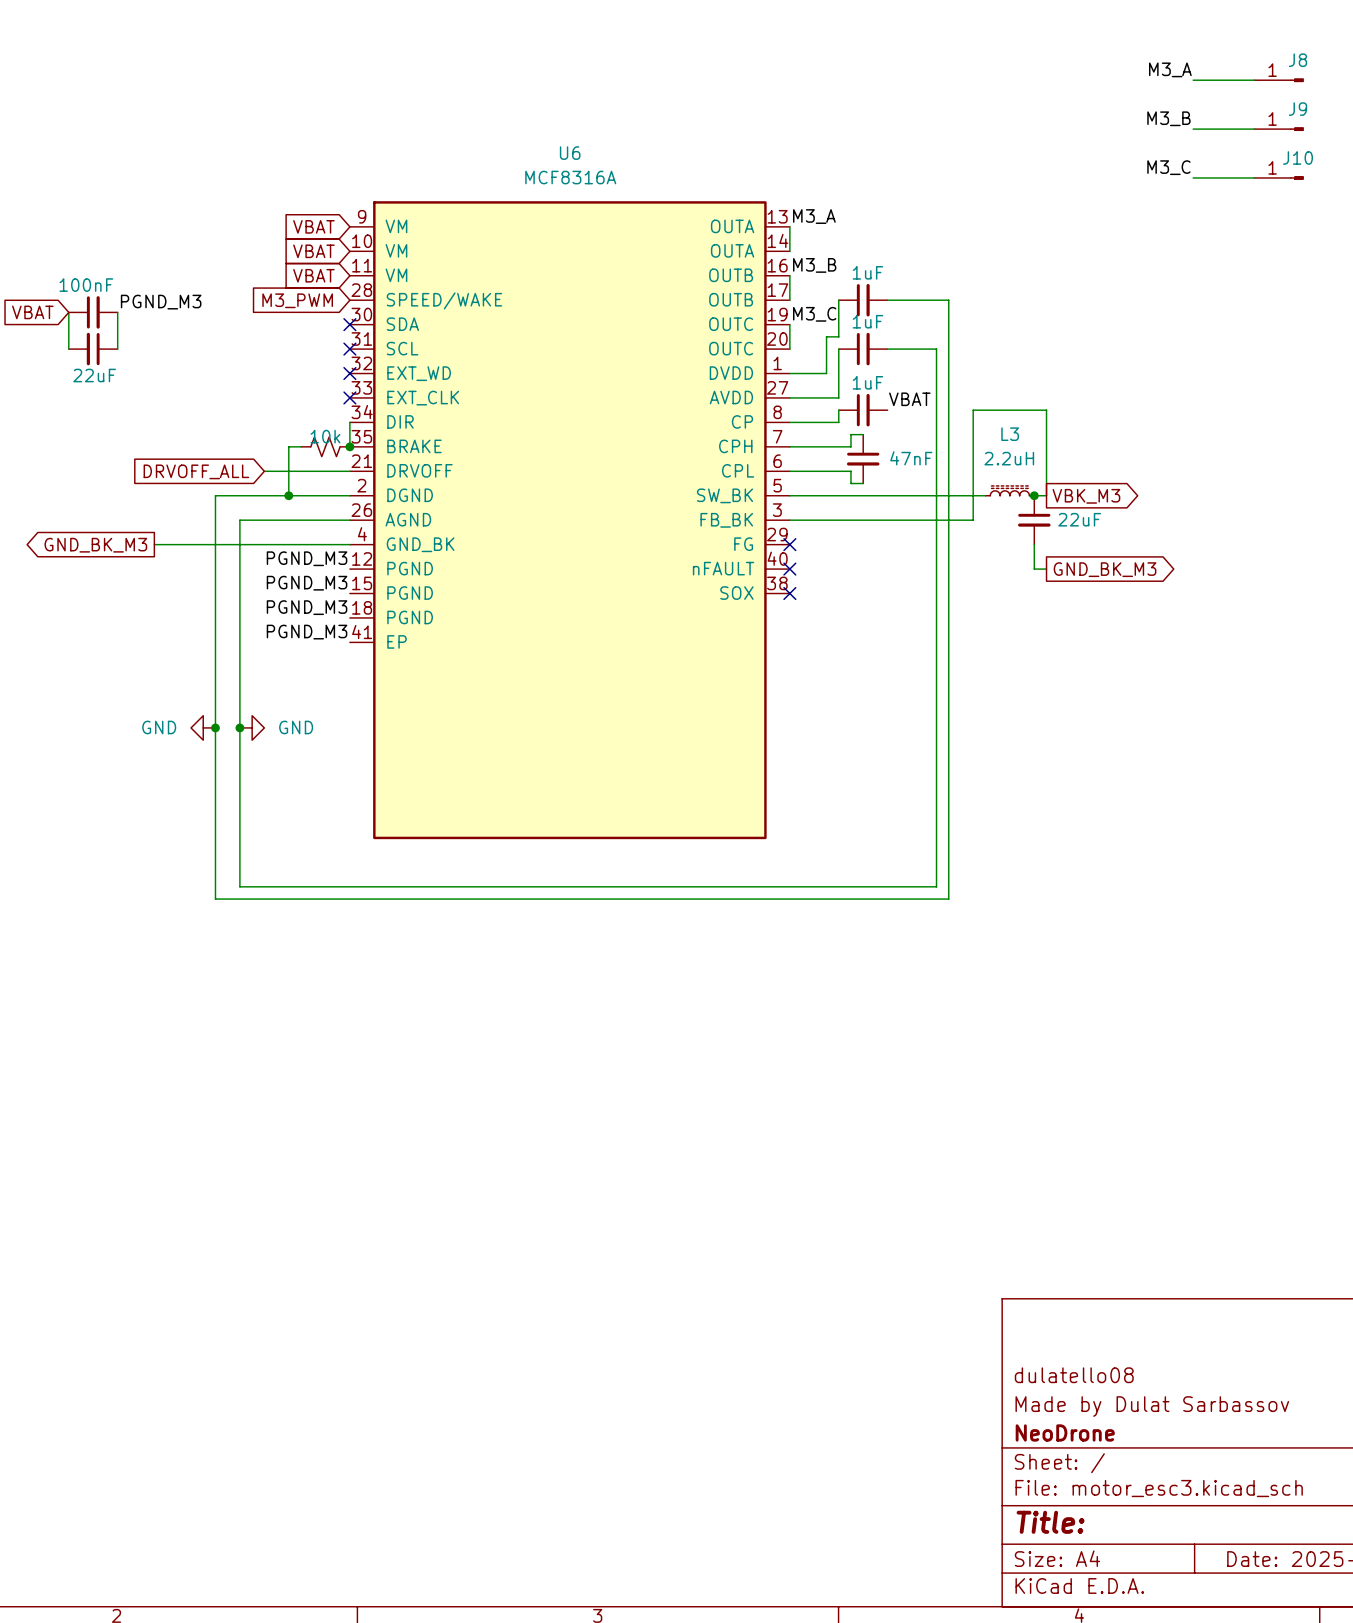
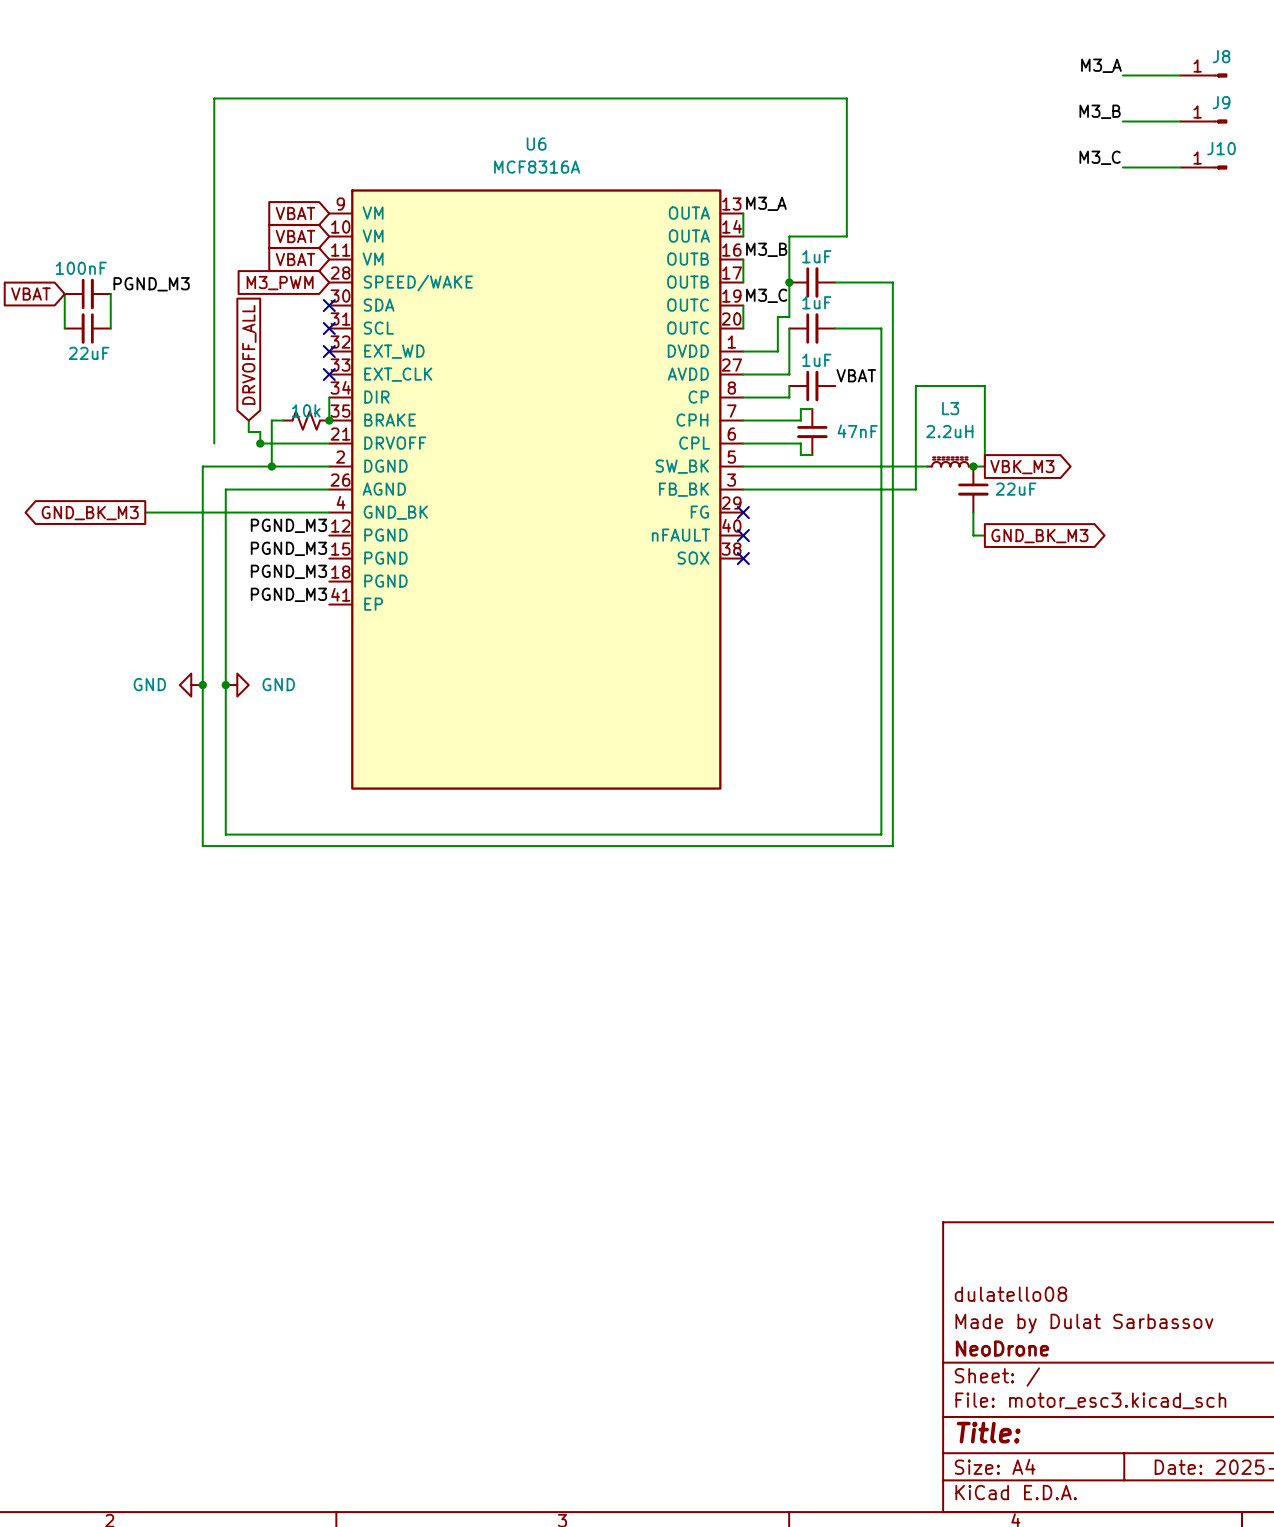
wire: none -> (789, 282) (789, 236) (846, 236) (846, 98) (214, 98) (214, 443)
junction: none -> (789, 282)
global label rotation: 0° (196, 471) -> 90° clockwise (249, 354)
wire: (264, 471) (276, 471) -> (248, 420) (248, 432) (260, 432) (260, 443)
junction: none -> (260, 443)

